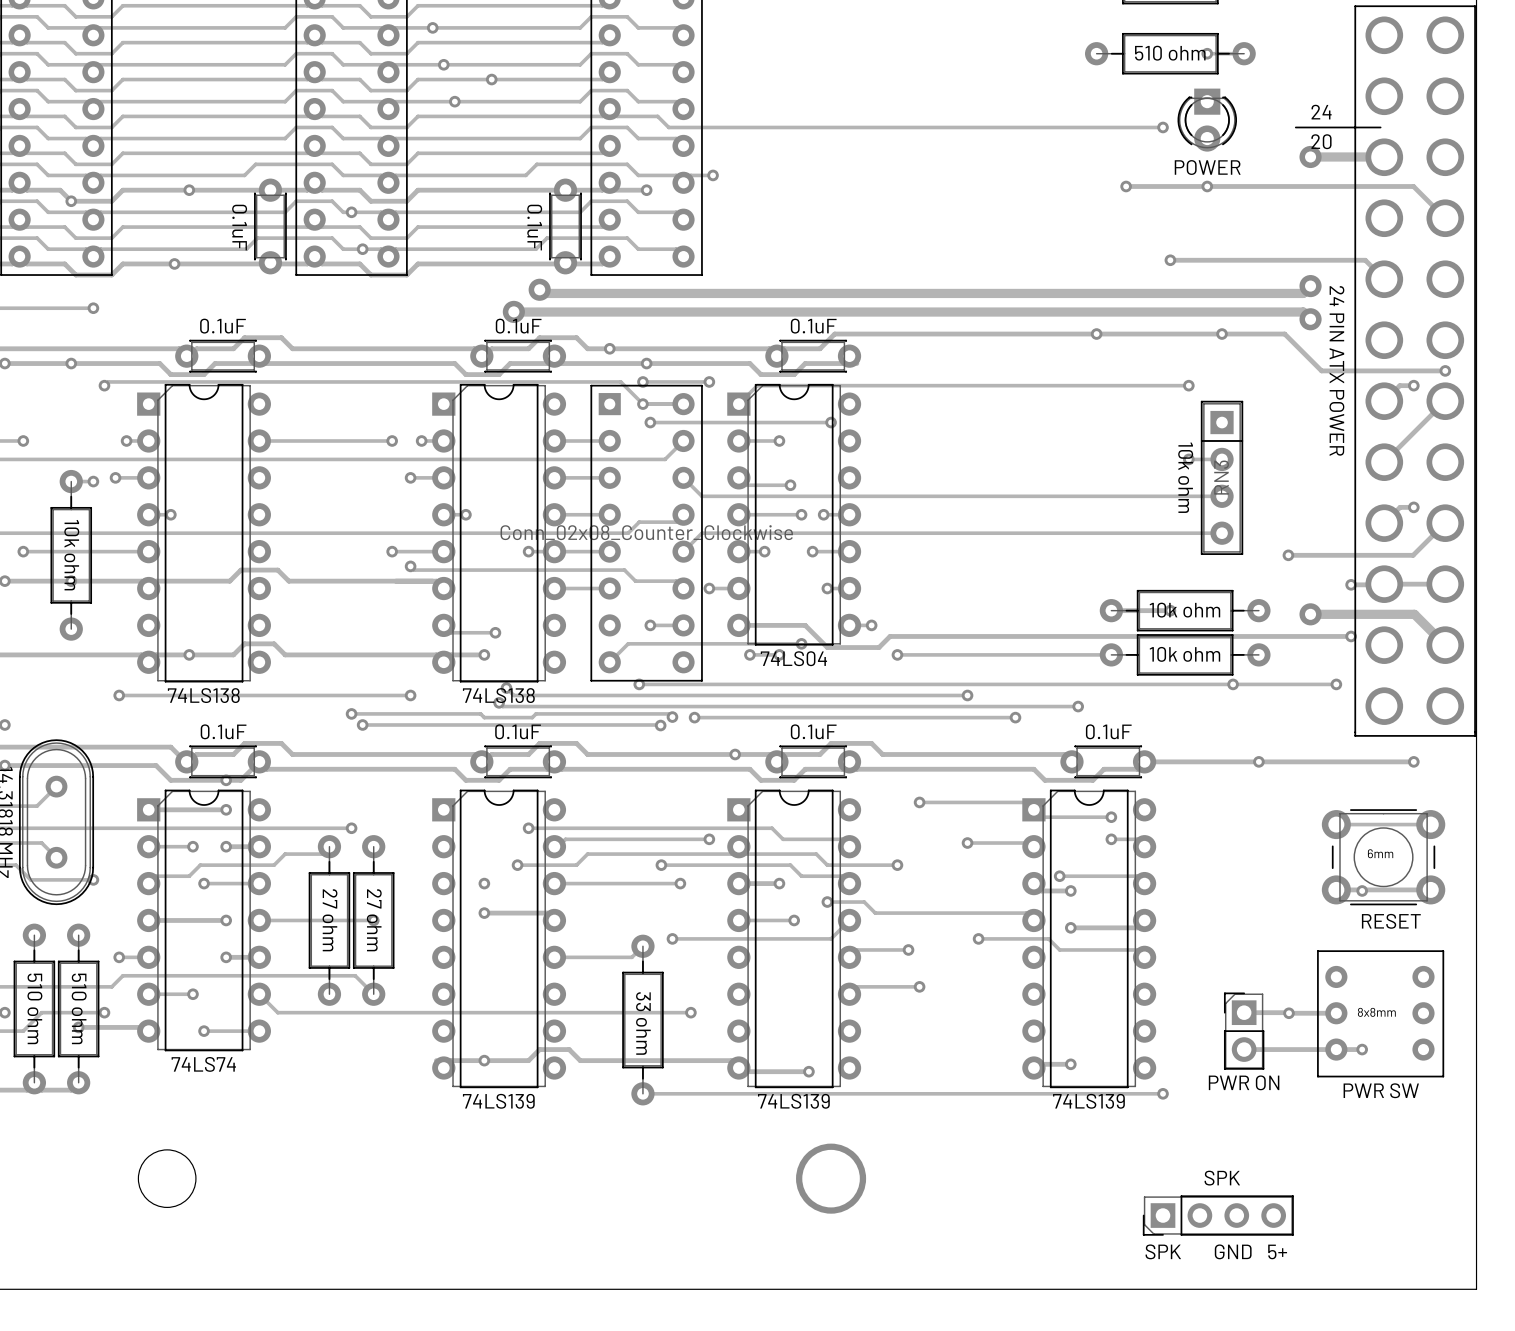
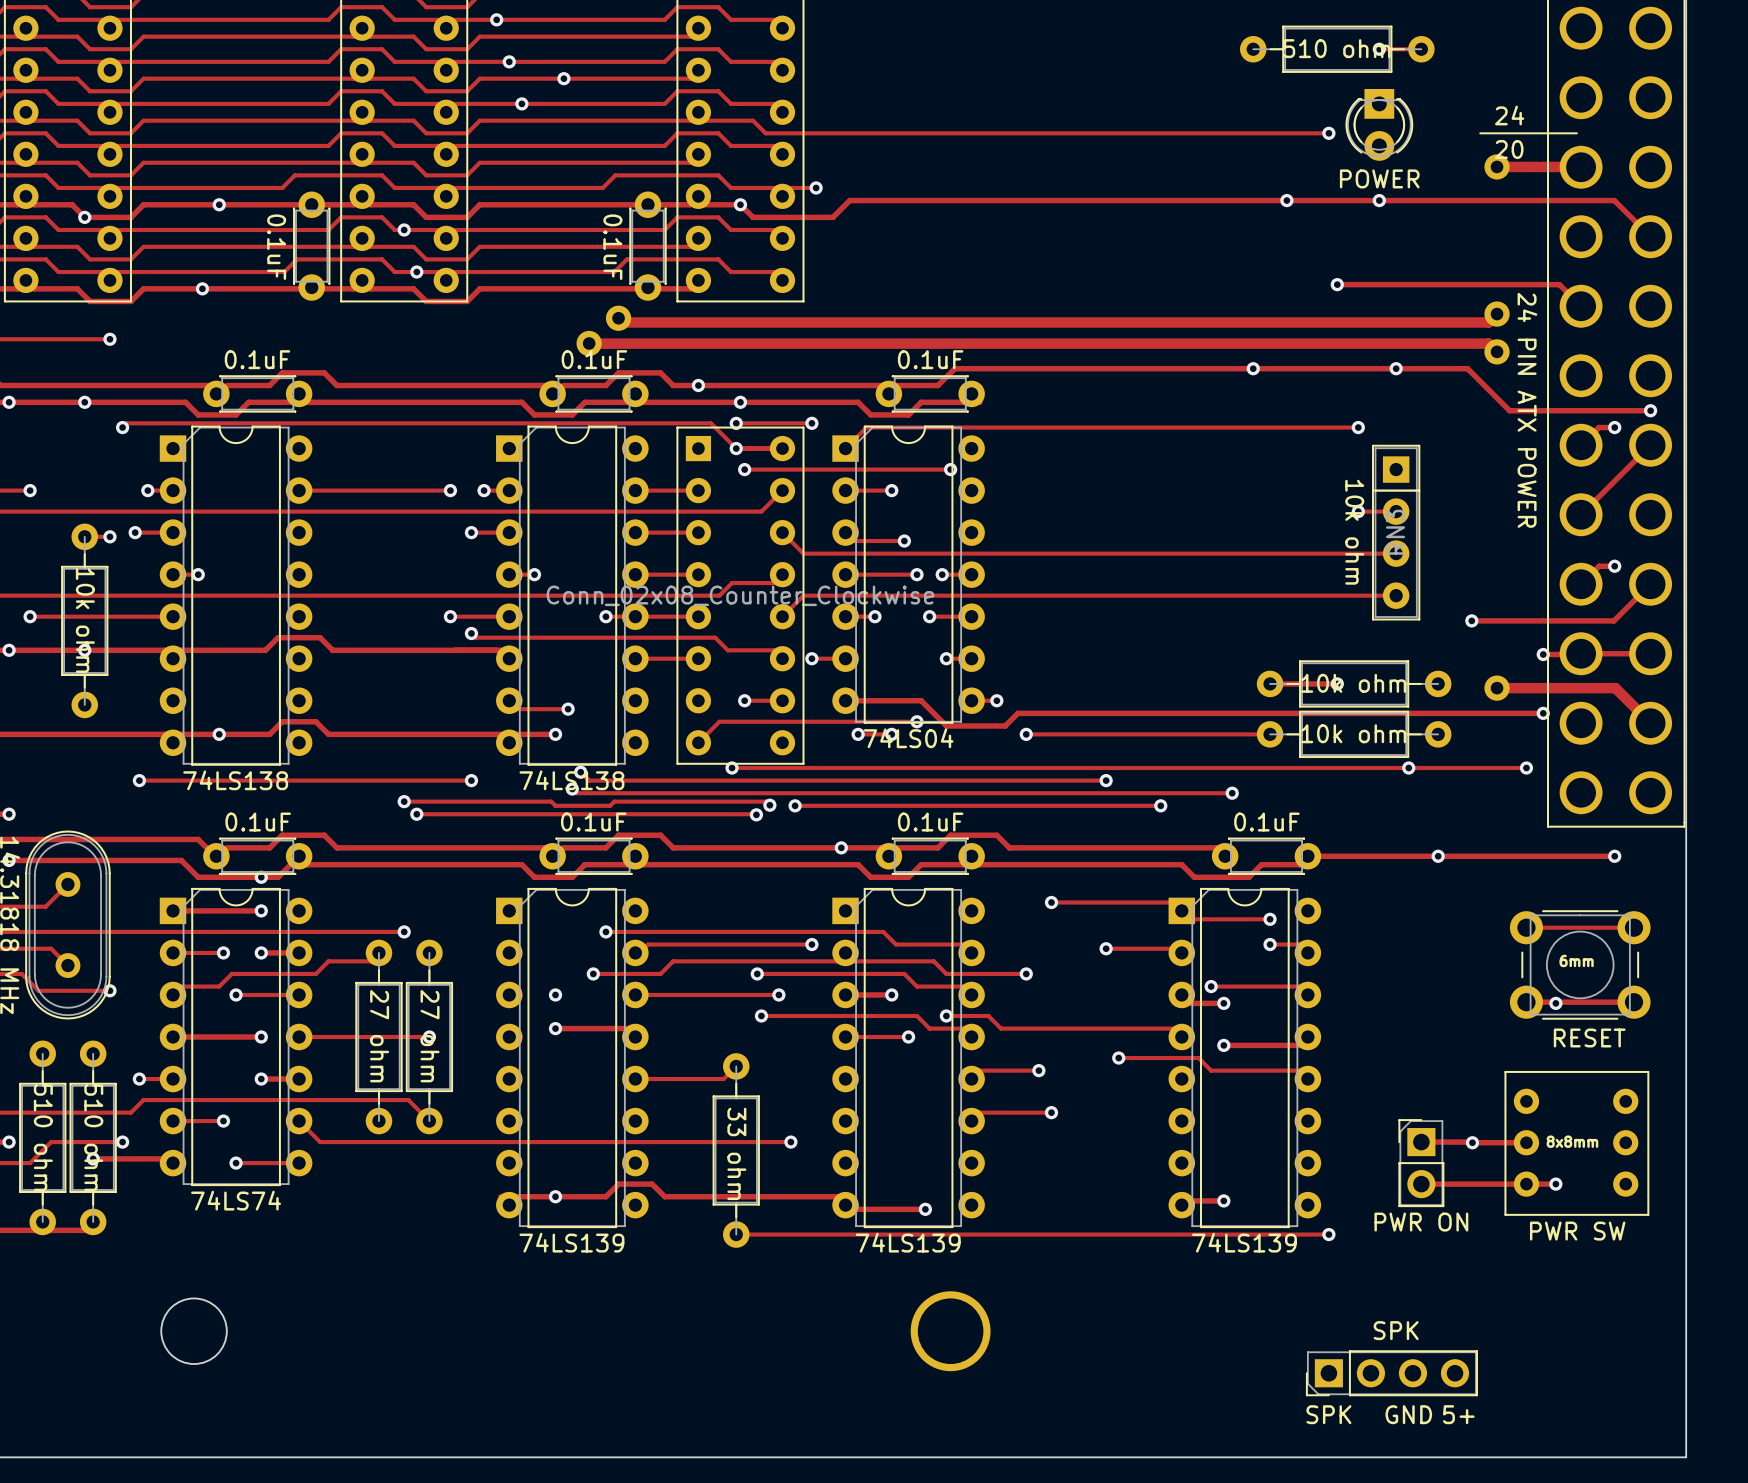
track: none -> (1286, 200) (849, 200) (832, 217) (753, 217) (740, 204)
track: (849, 920) (831, 938) (672, 938) -> (971, 1037) (963, 1028) (929, 1028) (916, 1015) (761, 1015)
via position: (672, 938) -> (761, 1015)

